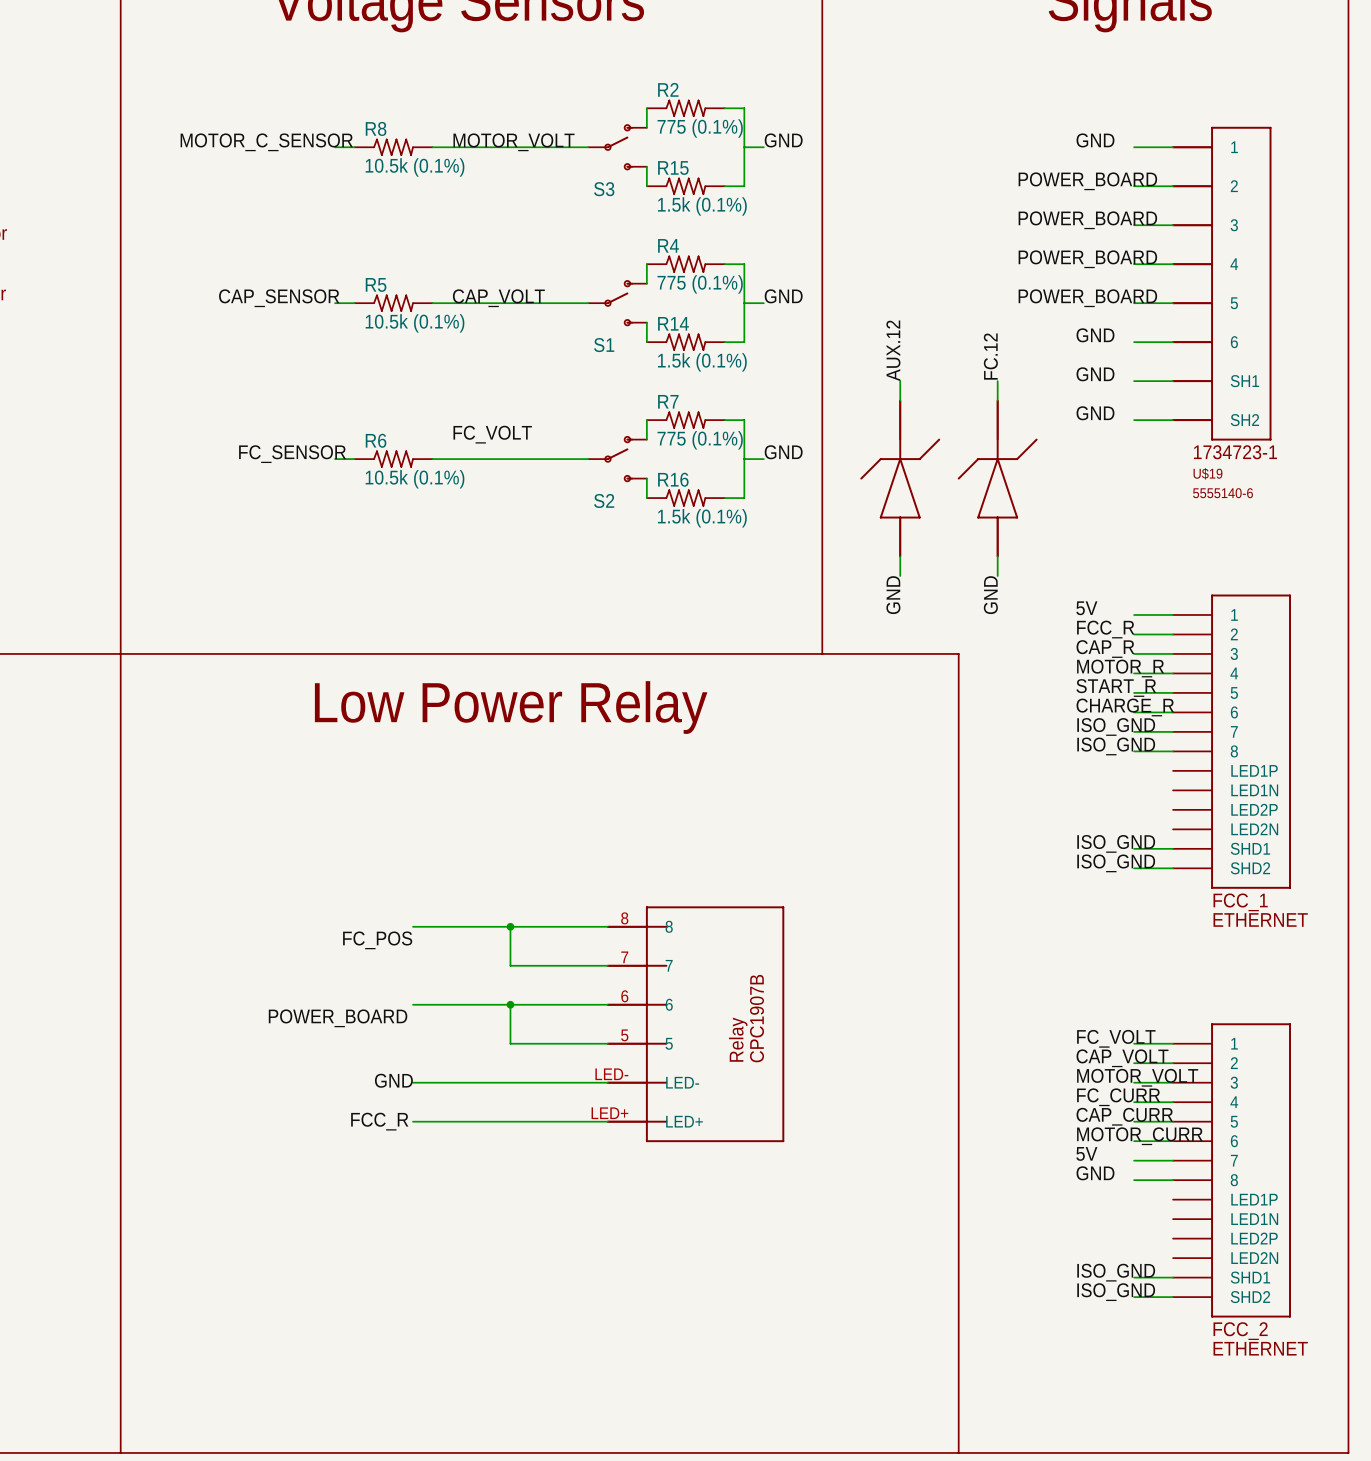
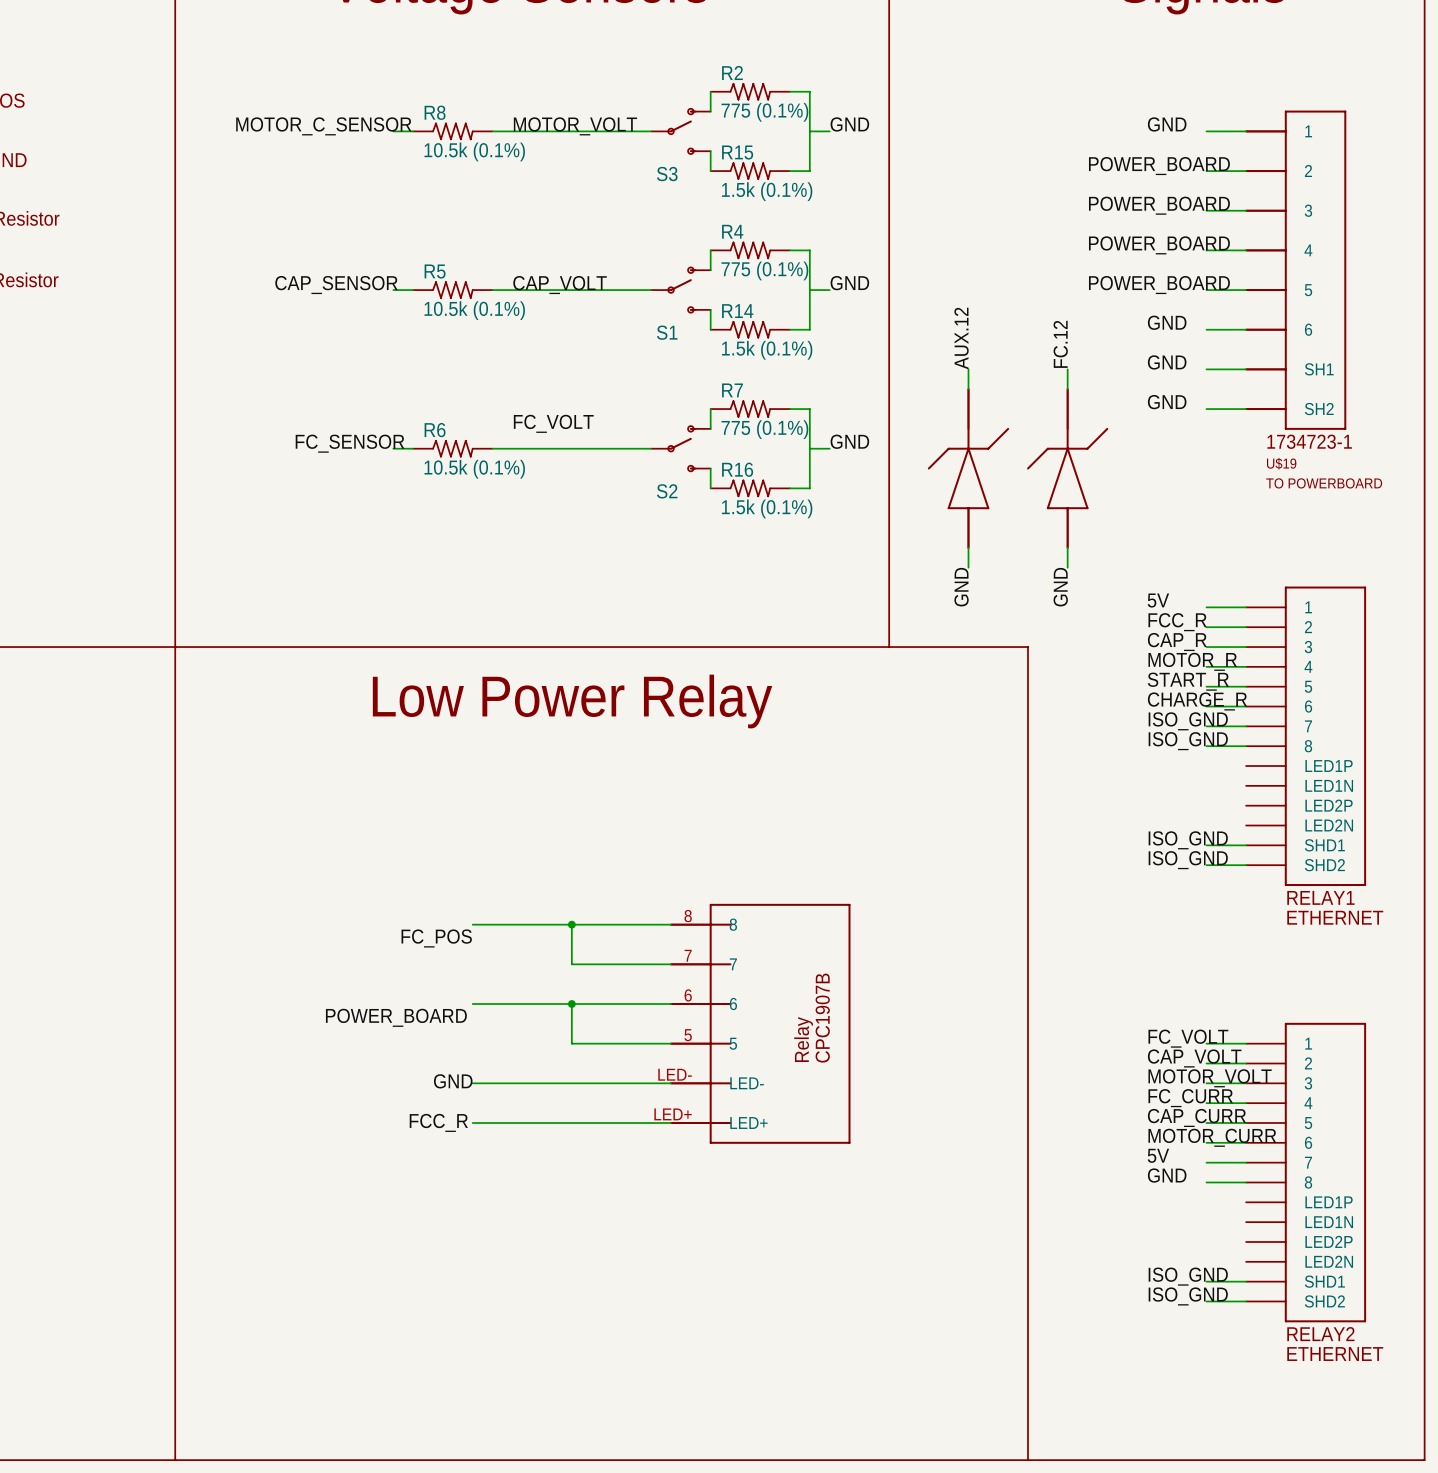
U$19 value: 5555140-6 (1223, 493) -> TO POWERBOARD (1324, 483)
FCC_1 name: FCC_1 (1240, 902) -> RELAY1 (1320, 897)
FCC_2 name: FCC_2 (1240, 1331) -> RELAY2 (1320, 1334)

